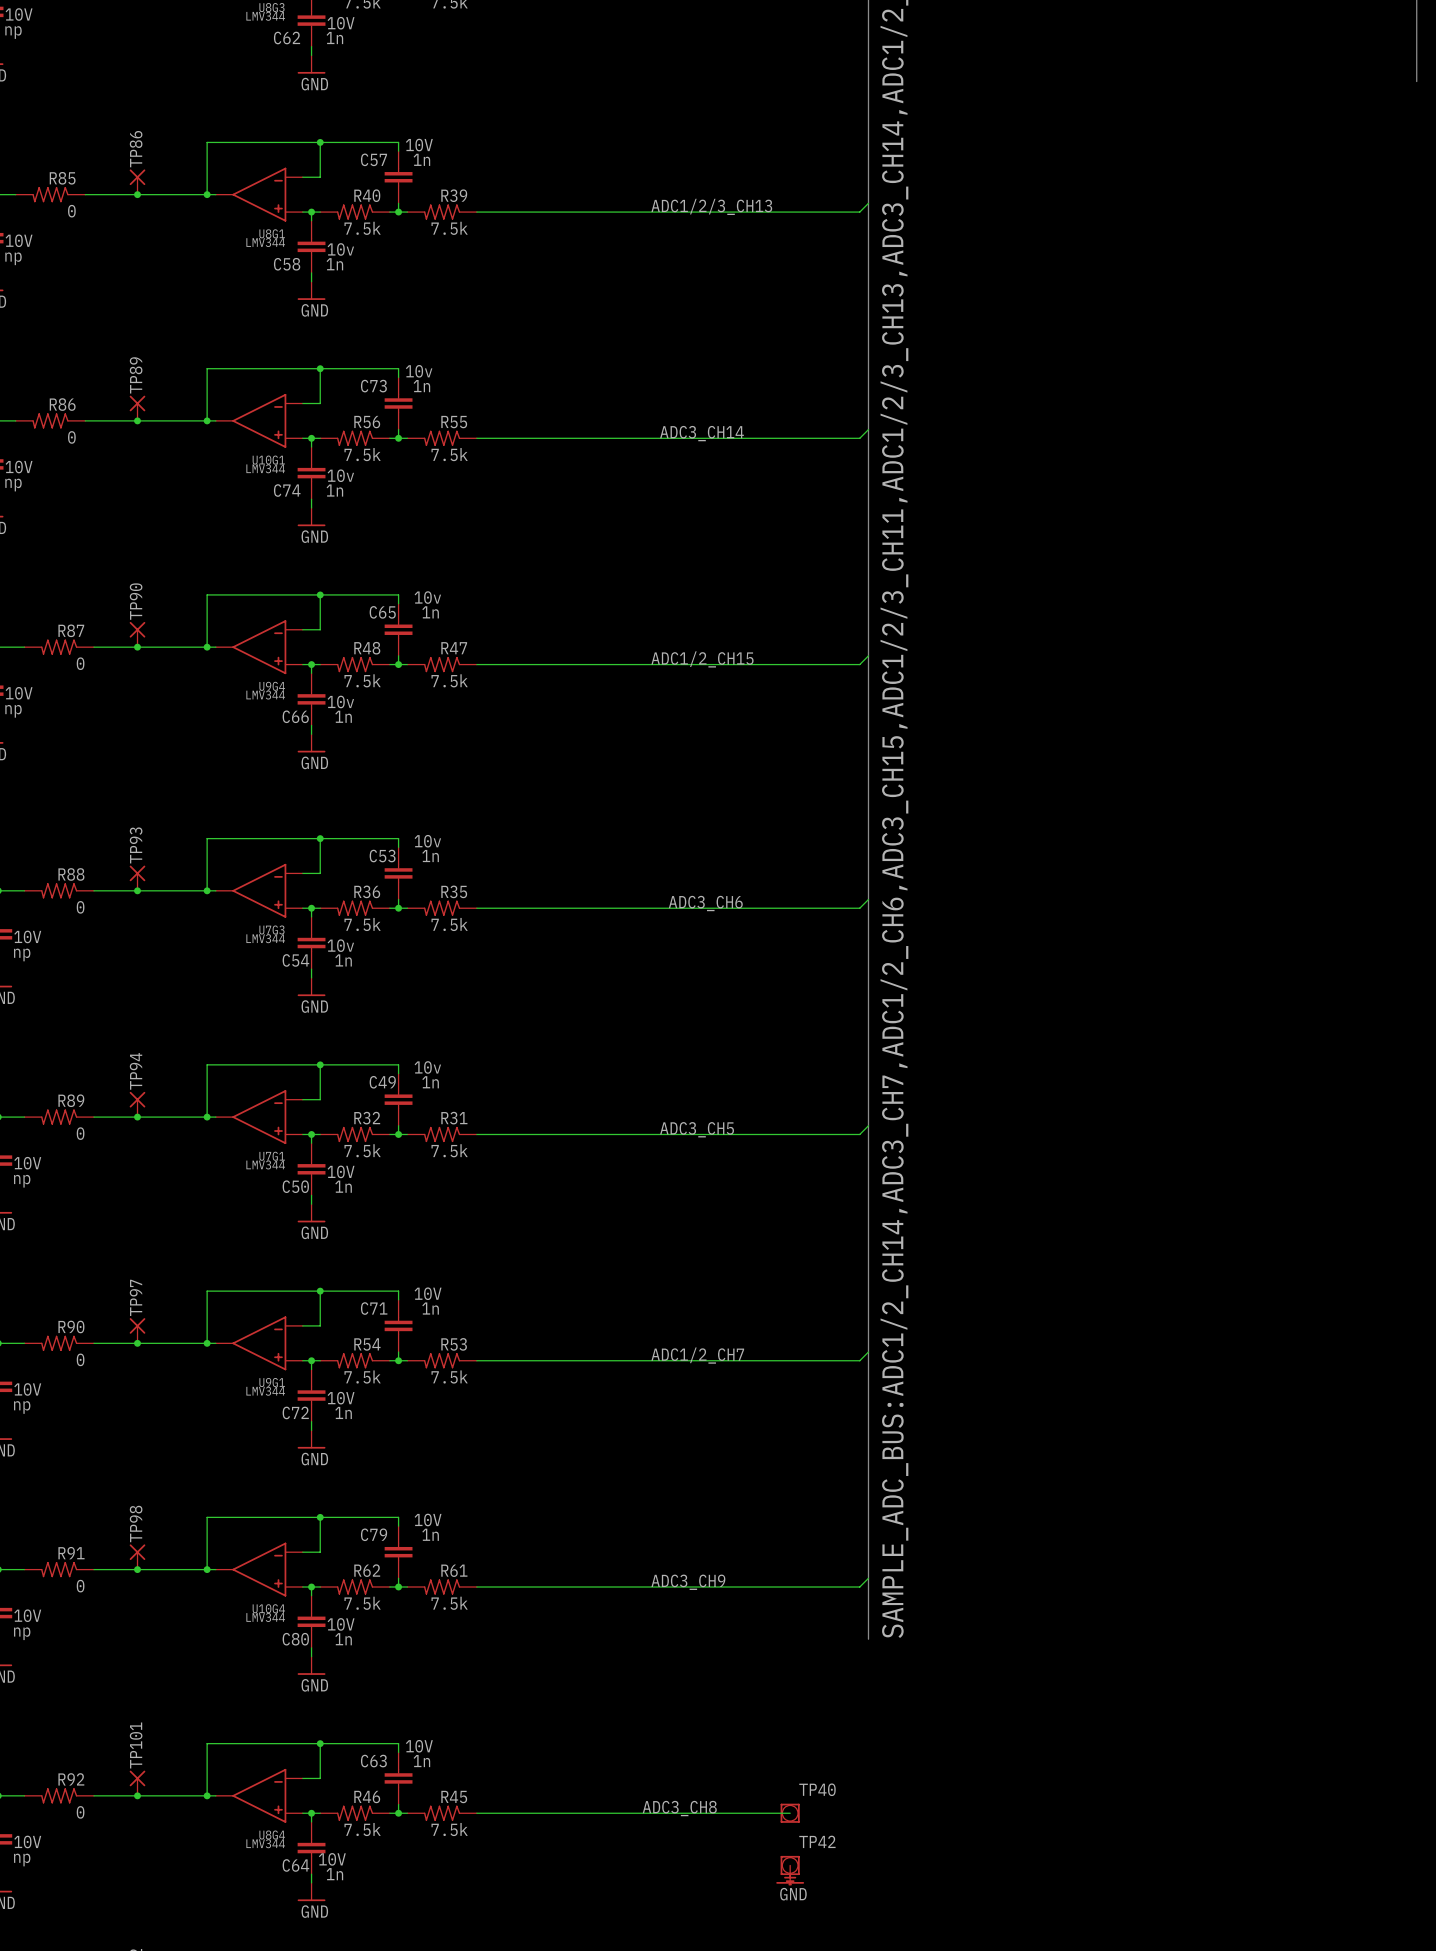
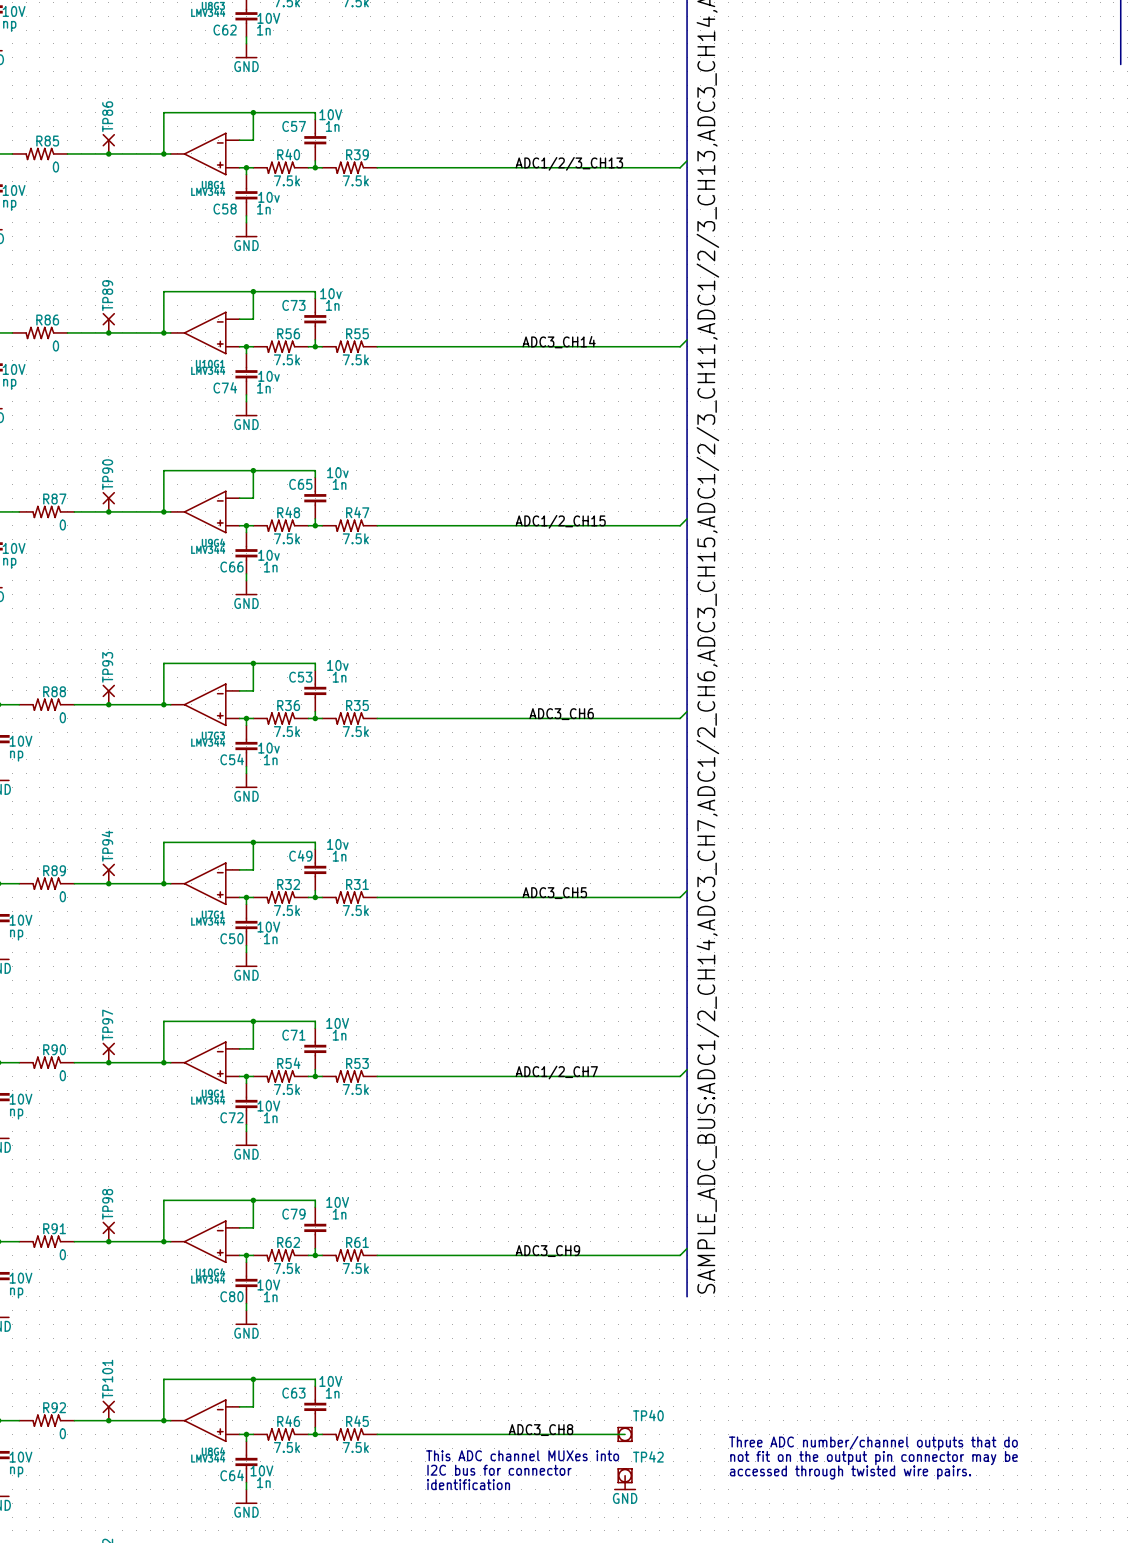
text: none -> Three ADC number/channel outputs that do (873, 1443)
text: none -> This ADC channel MUXes into (522, 1455)
text: none -> not fit on the output pin connector may be (874, 1458)
TP42 symbol: [780, 1855, 800, 1886] -> [617, 1468, 633, 1484]
text: none -> I2C bus for connector (499, 1470)
text: none -> accessed through twisted wire pairs. (850, 1472)
text: none -> identification (468, 1484)

